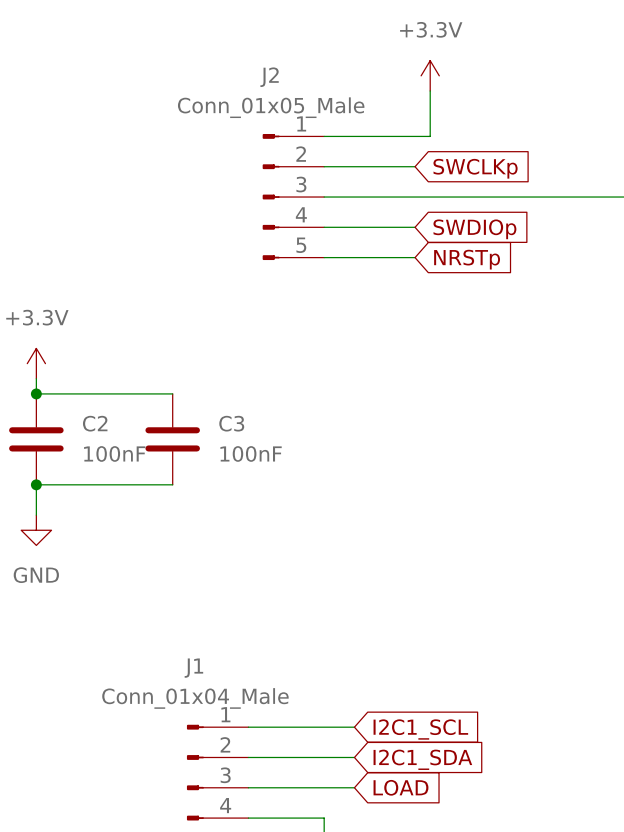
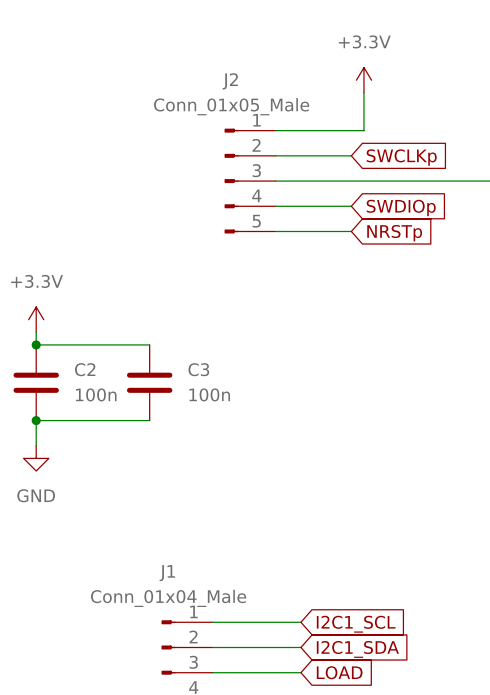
C2 value: 100nF (114, 453) -> 100n (96, 394)
C3 value: 100nF (251, 453) -> 100n (209, 394)

